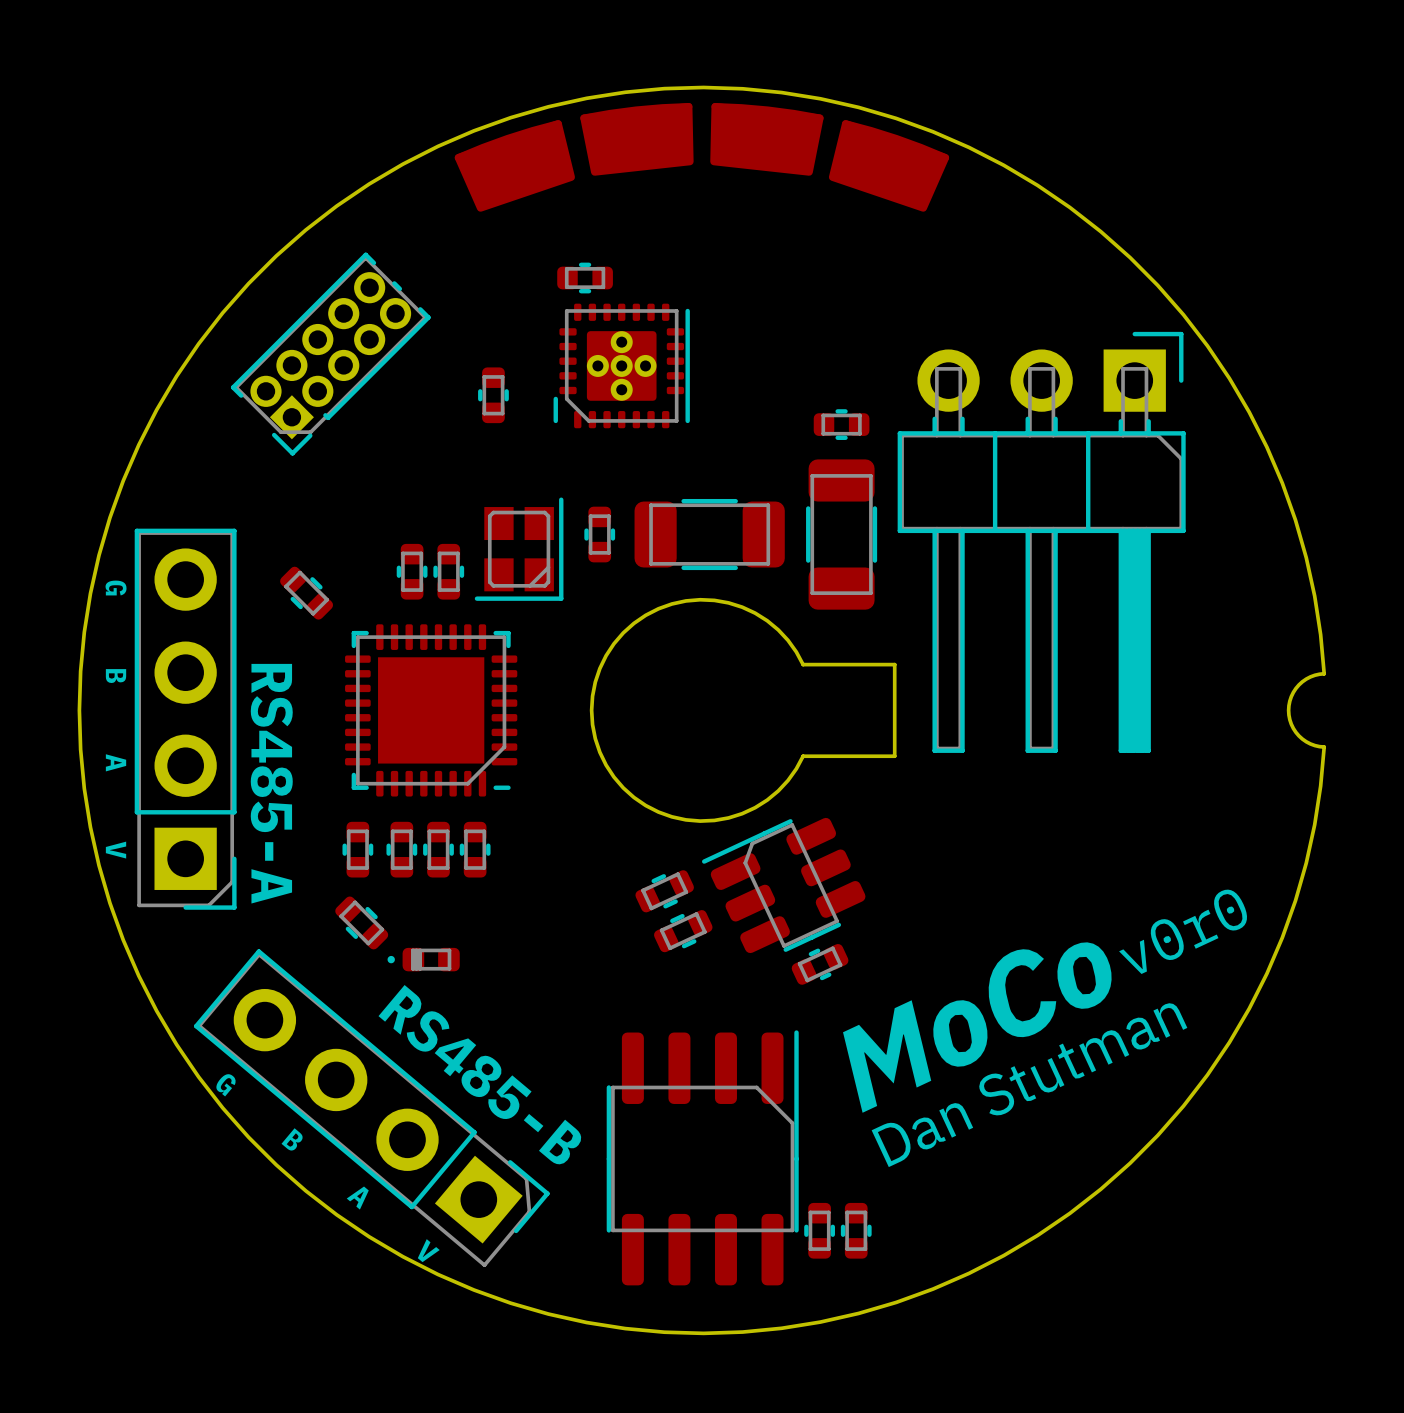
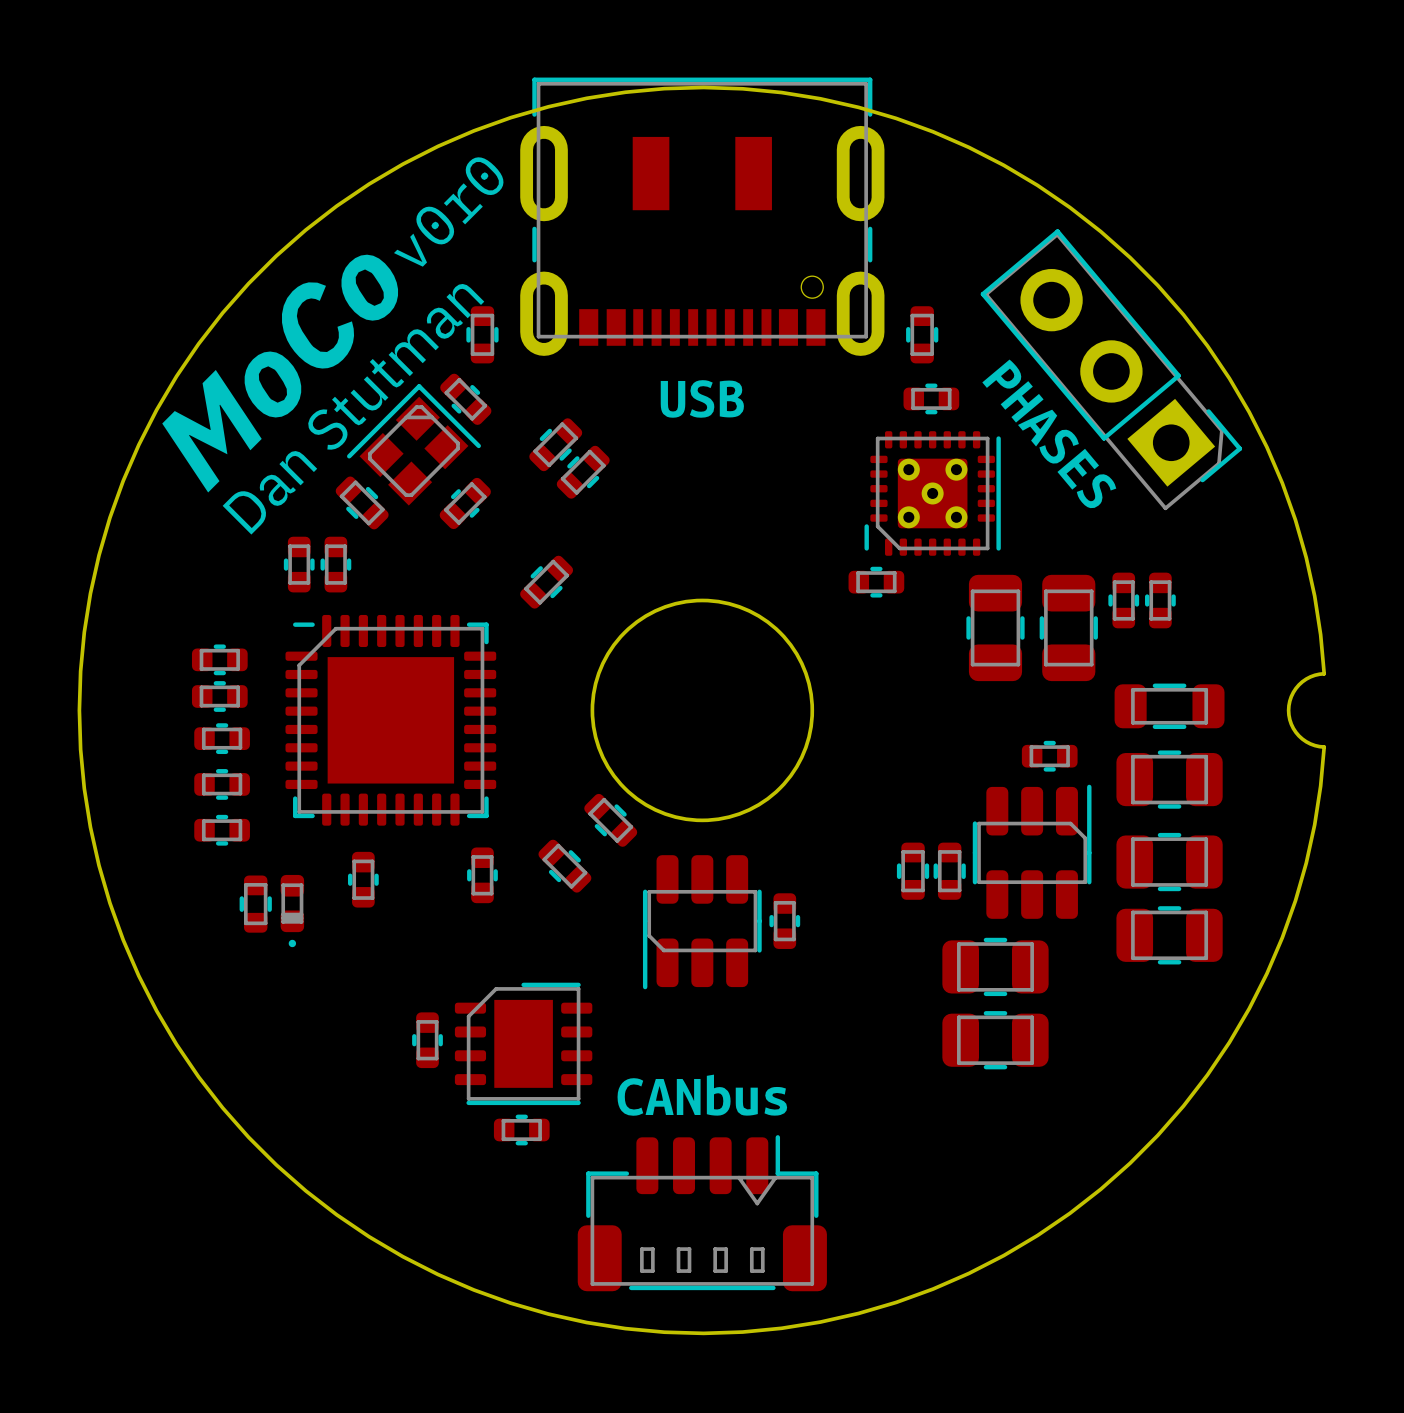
part: (636, 139) -> none
part: (766, 139) -> none
drawing: none -> [162, 157, 504, 535]
part: (514, 165) -> none
part: (889, 165) -> none
part: none -> (702, 216)
part: (585, 278) -> none
part: none -> (482, 334)
part: none -> (922, 334)
part: (330, 354) -> none
drawing: none -> [982, 359, 1117, 509]
part: (621, 365) -> none
part: none -> (1111, 369)
drawing: none -> [660, 380, 744, 418]
part rotation: 0° (493, 395) -> 45° counterclockwise (465, 399)
part: none -> (931, 398)
part: (841, 424) -> none
part: none -> (413, 444)
part: none -> (555, 444)
part: none -> (583, 472)
part: none -> (932, 493)
part: none -> (465, 503)
part: (599, 534) -> none
part: (709, 534) -> none
part: (841, 534) -> none
part: (1041, 542) -> none
part: (519, 549) -> none
part: none -> (299, 564)
part: none -> (335, 564)
part: (412, 571) -> none
part: (448, 571) -> none
drawing: [105, 580, 127, 859] -> none
part: none -> (546, 582)
part: none -> (876, 582)
part position: (306, 593) -> (362, 502)
round board edge: none -> [590, 598, 815, 823]
part: none -> (1123, 600)
part: none -> (1160, 600)
part: none -> (995, 627)
part: none -> (1068, 627)
part: none -> (219, 659)
drawing: [250, 663, 293, 904] -> none
board edge: (803, 664) (894, 664) (894, 756) (803, 756) (788, 780) (767, 800) (742, 813) (714, 820) (700, 821) (685, 819) (658, 812) (633, 797) (613, 777) (599, 752) (595, 738) (591, 710) (592, 696) (599, 668) (613, 643) (623, 632) (645, 615) (658, 608) (685, 600) (700, 599) (714, 600) (742, 607) (755, 613) (778, 629) (788, 640) (803, 664) -> none
part: none -> (219, 696)
part: none -> (1169, 706)
part: (431, 710) -> none
part: (185, 719) -> none
part: none -> (390, 720)
part: none -> (222, 738)
part: none -> (1049, 756)
part: none -> (1169, 779)
part: none -> (222, 784)
part: none -> (610, 820)
part: none -> (222, 830)
part: (357, 849) -> none
part: (401, 849) -> none
part: (438, 849) -> none
part: (475, 849) -> none
part: none -> (1032, 851)
part: none -> (1169, 862)
part: none -> (564, 866)
part: none -> (913, 871)
part: none -> (949, 871)
part: none -> (482, 875)
part: none -> (363, 879)
part: (783, 885) -> none
drawing: [843, 889, 1247, 1168] -> none
part: (664, 891) -> none
part: none -> (255, 904)
part footprint: [654, 910, 713, 953] -> [642, 855, 762, 990]
part: none -> (784, 921)
part: (361, 922) -> none
part: none -> (1169, 935)
part rotation: 0° (423, 959) -> 90° counterclockwise (292, 911)
part position: (423, 959) -> (292, 911)
part: (820, 964) -> none
part: none -> (995, 966)
drawing: [216, 985, 582, 1263] -> none
part: none -> (427, 1040)
part: none -> (995, 1040)
part: none -> (523, 1043)
drawing: none -> [617, 1074, 788, 1116]
part: (371, 1108) -> none
part: none -> (521, 1130)
part: (702, 1157) -> none
part: none -> (702, 1213)
part: (819, 1230) -> none
part: (856, 1230) -> none

